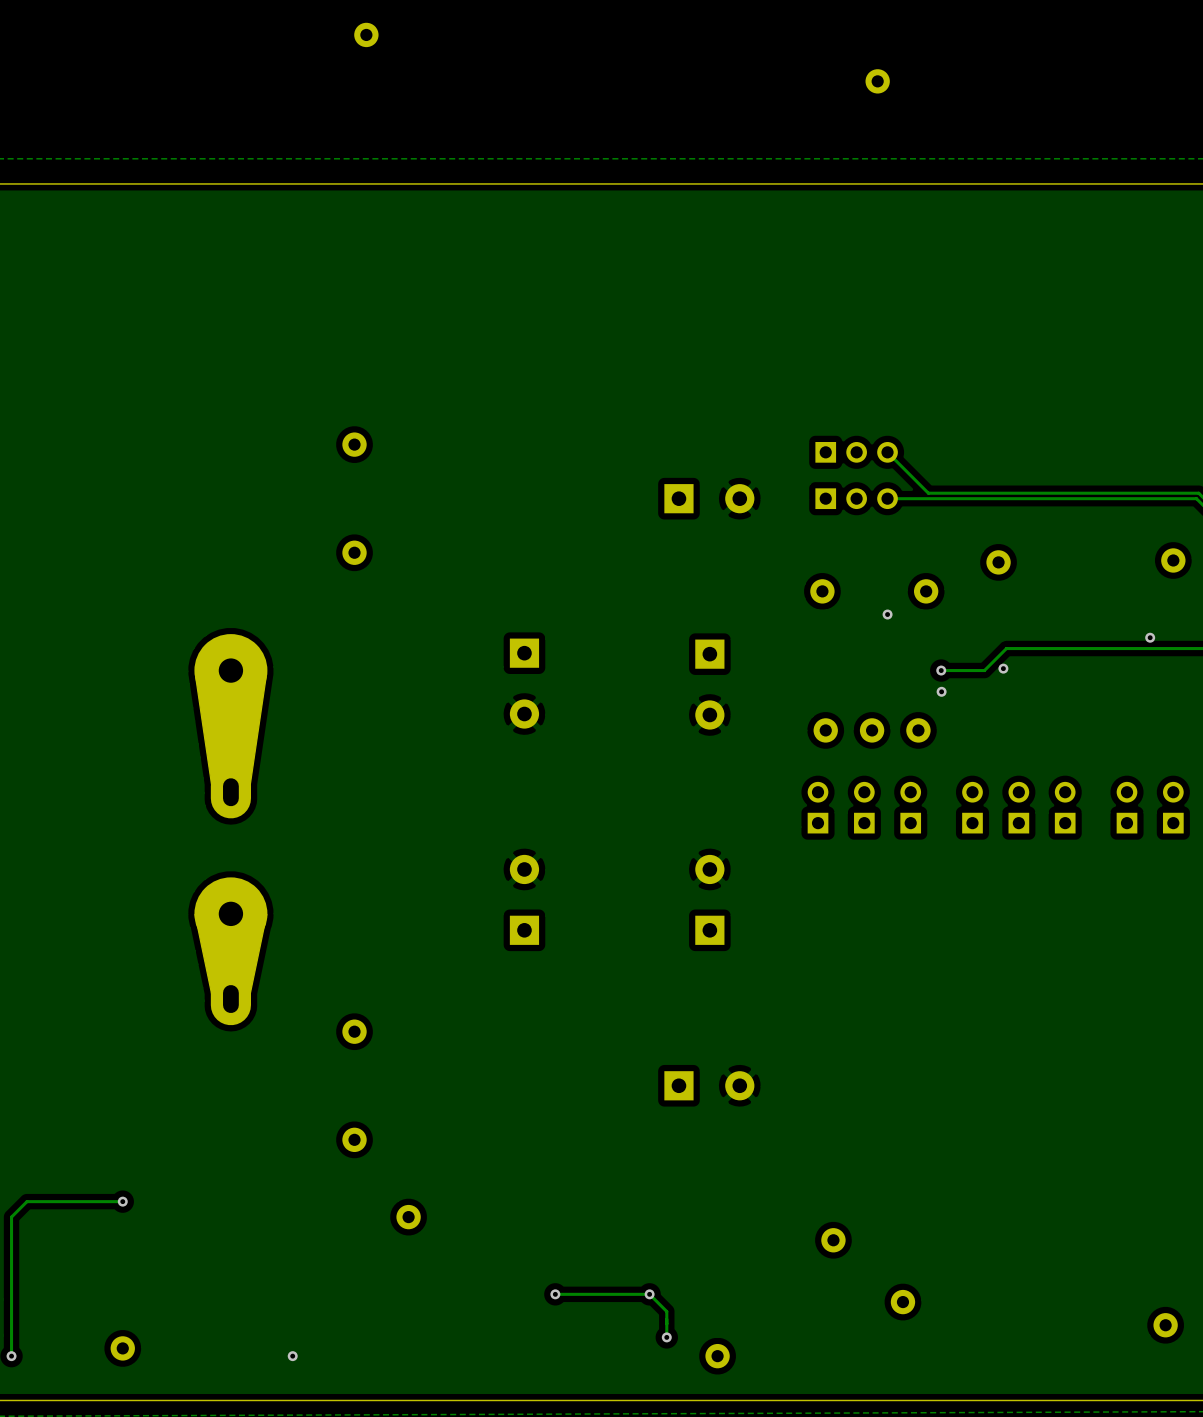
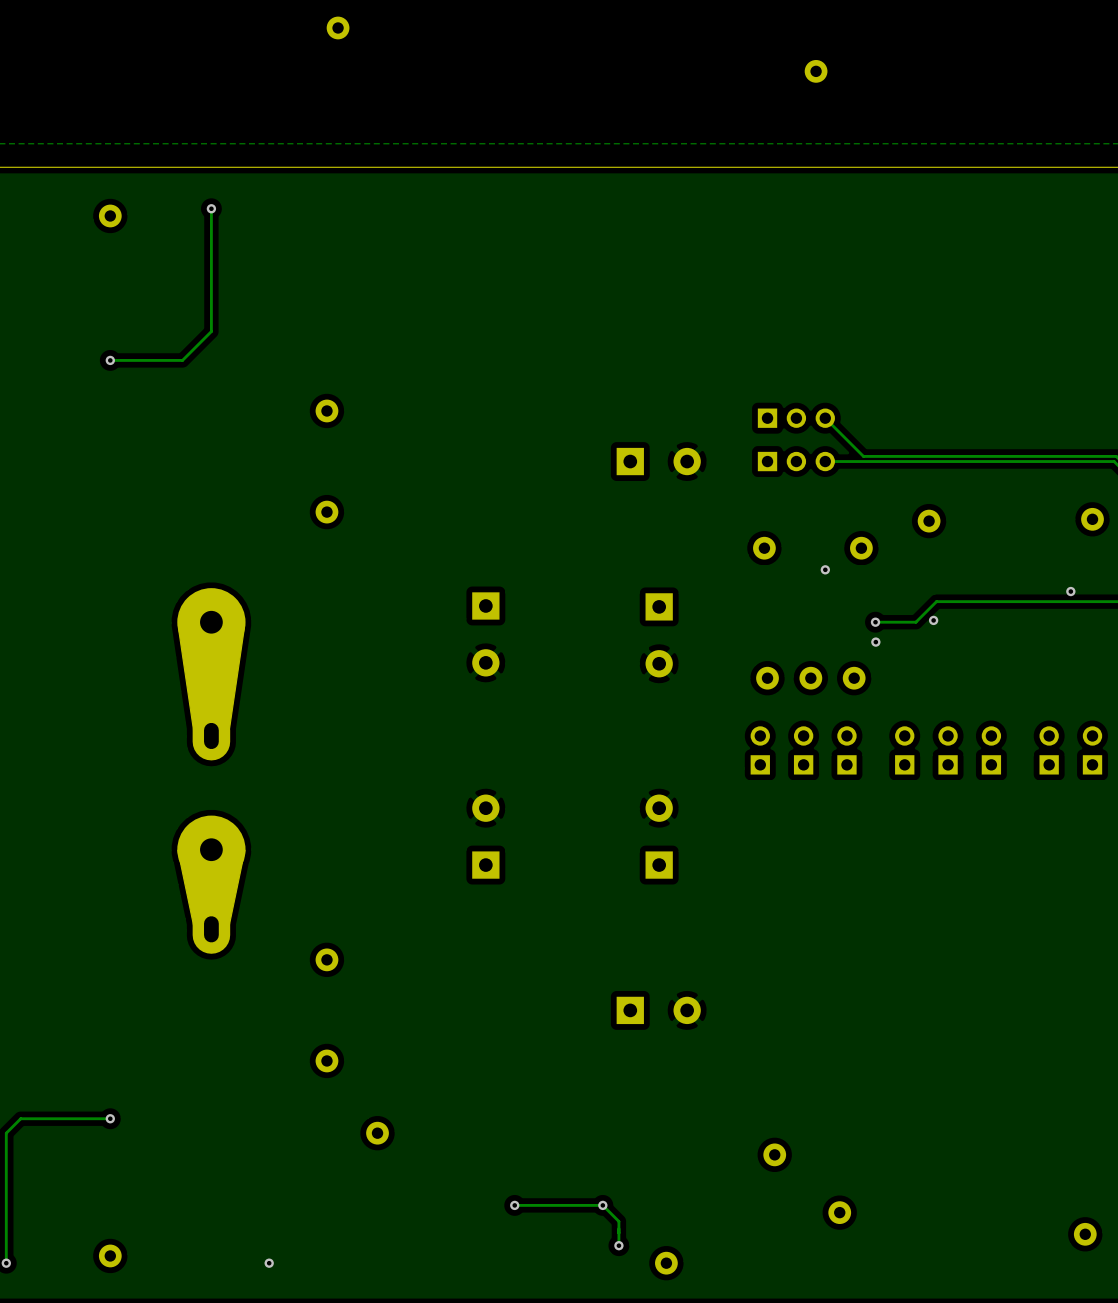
track: none -> (211, 208) (211, 331) (182, 360) (110, 360)
via: none -> (211, 208)
part: none -> (110, 215)
via: none -> (110, 360)

